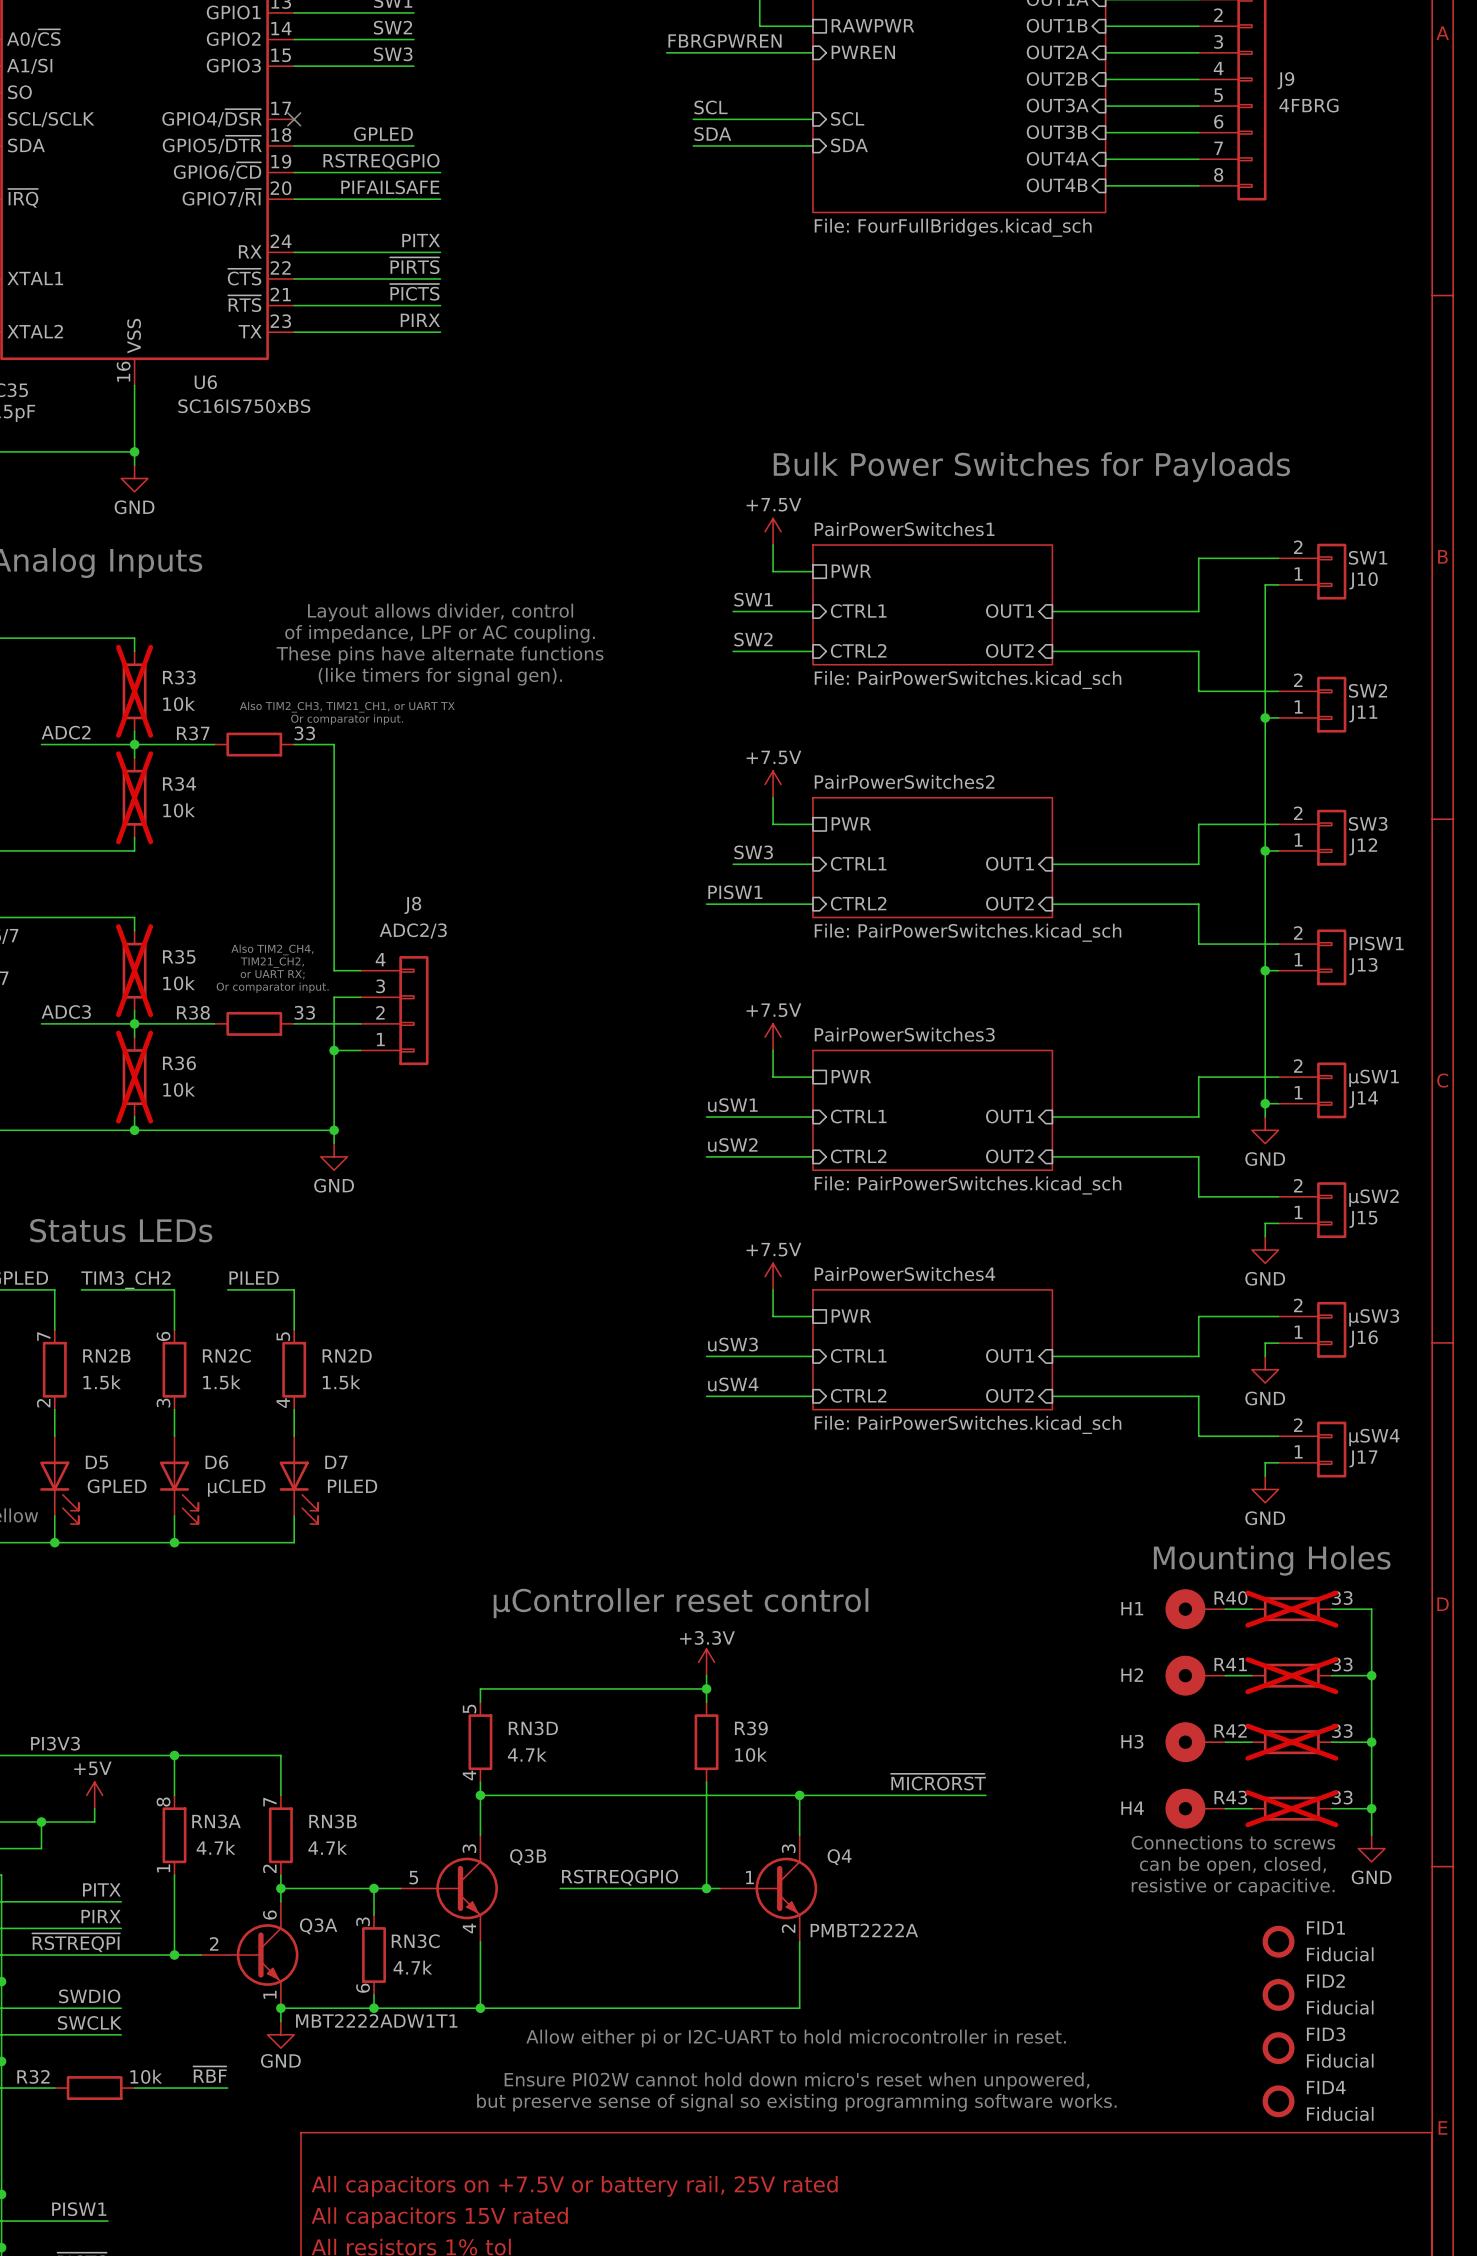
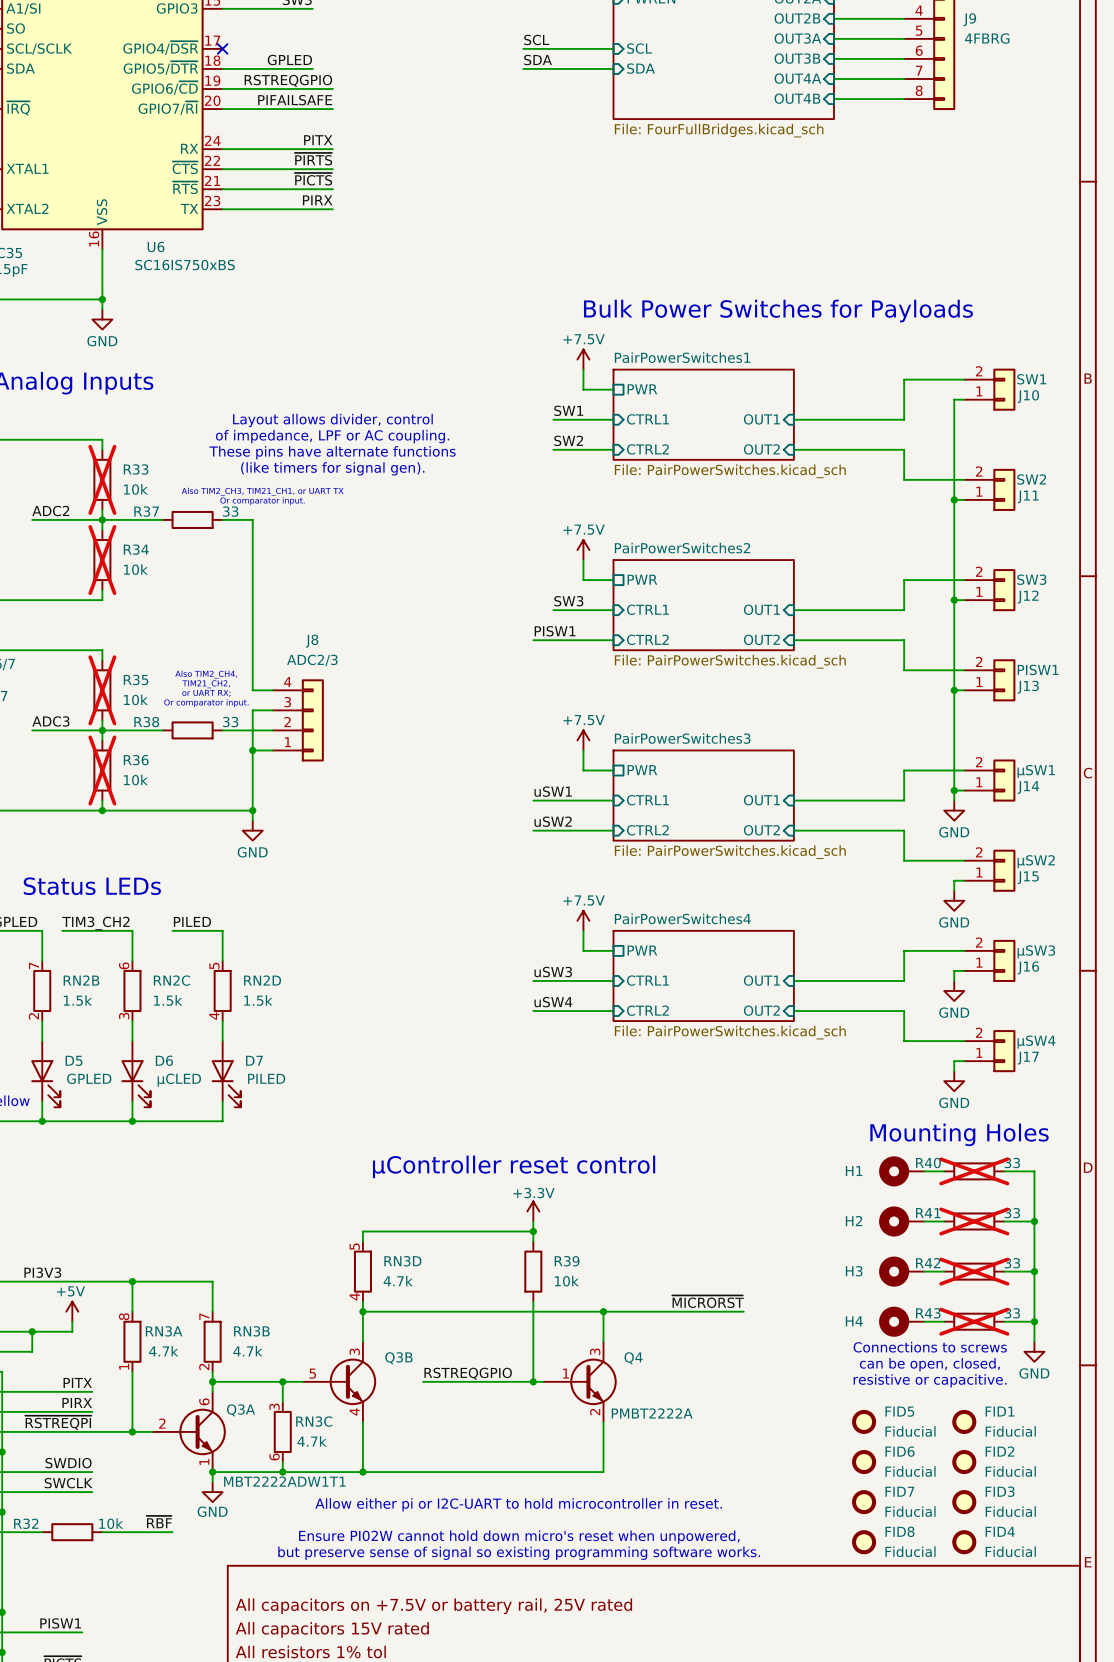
FID5: none -> Fiducial (864, 1421)
FID6: none -> Fiducial (864, 1462)
text position: Allow either pi or I2C-UART to hold microcontroller in reset. (796, 2038) -> Allow either pi or I2C-UART to hold microcontroller in reset. (518, 1504)
FID7: none -> Fiducial (864, 1502)
text position: Ensure PI02W cannot hold down micro's reset when unpowered, (797, 2081) -> Ensure PI02W cannot hold down micro's reset when unpowered, (519, 1537)
FID8: none -> Fiducial (864, 1542)
text position: but preserve sense of signal so existing programming software works. (796, 2102) -> but preserve sense of signal so existing programming software works. (519, 1553)

